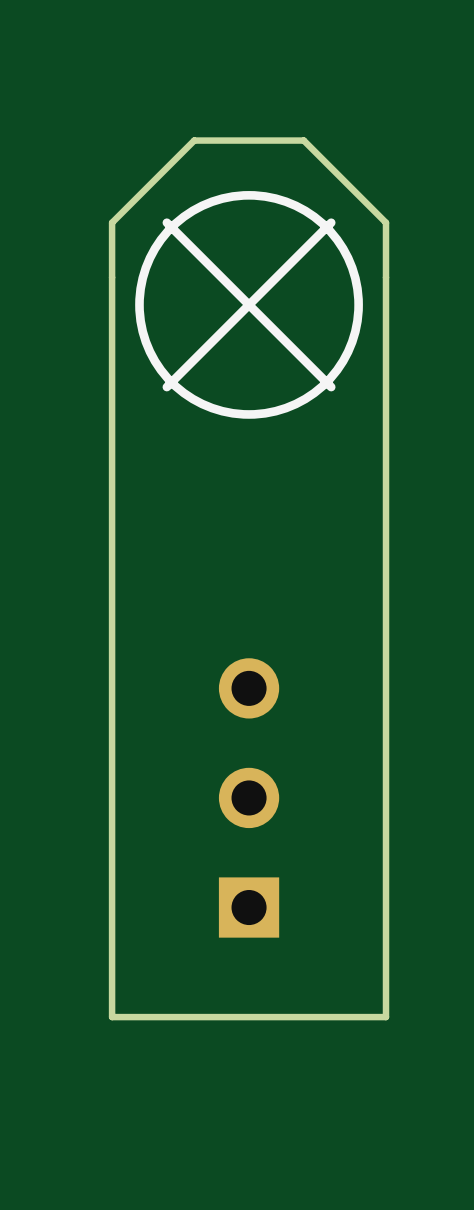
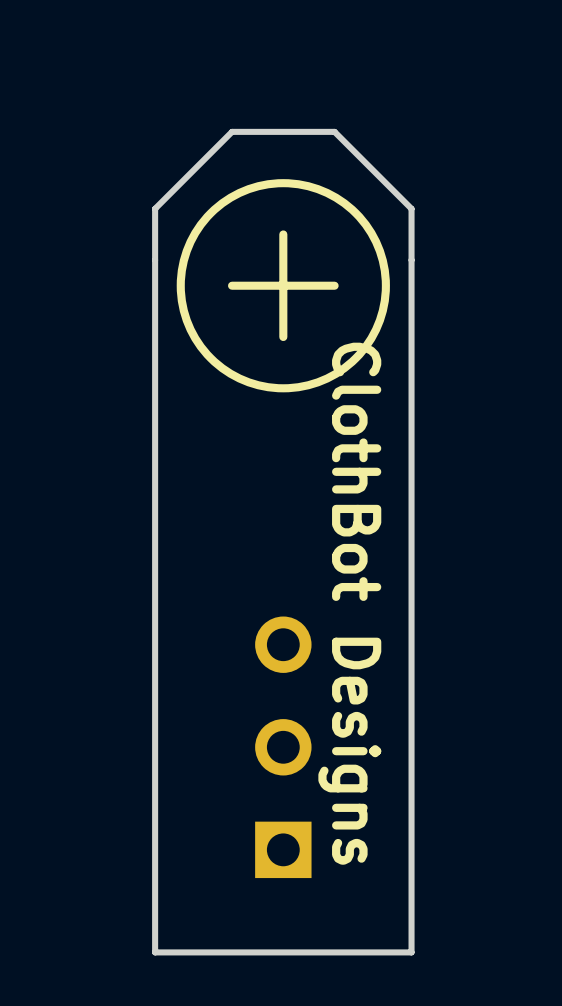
line: (166, 222) (331, 387) -> none
line: (331, 222) (166, 387) -> none
line: none -> (283, 234) (283, 337)
line: none -> (334, 285) (232, 285)
text: none -> ClothBot Designs (349, 603)

